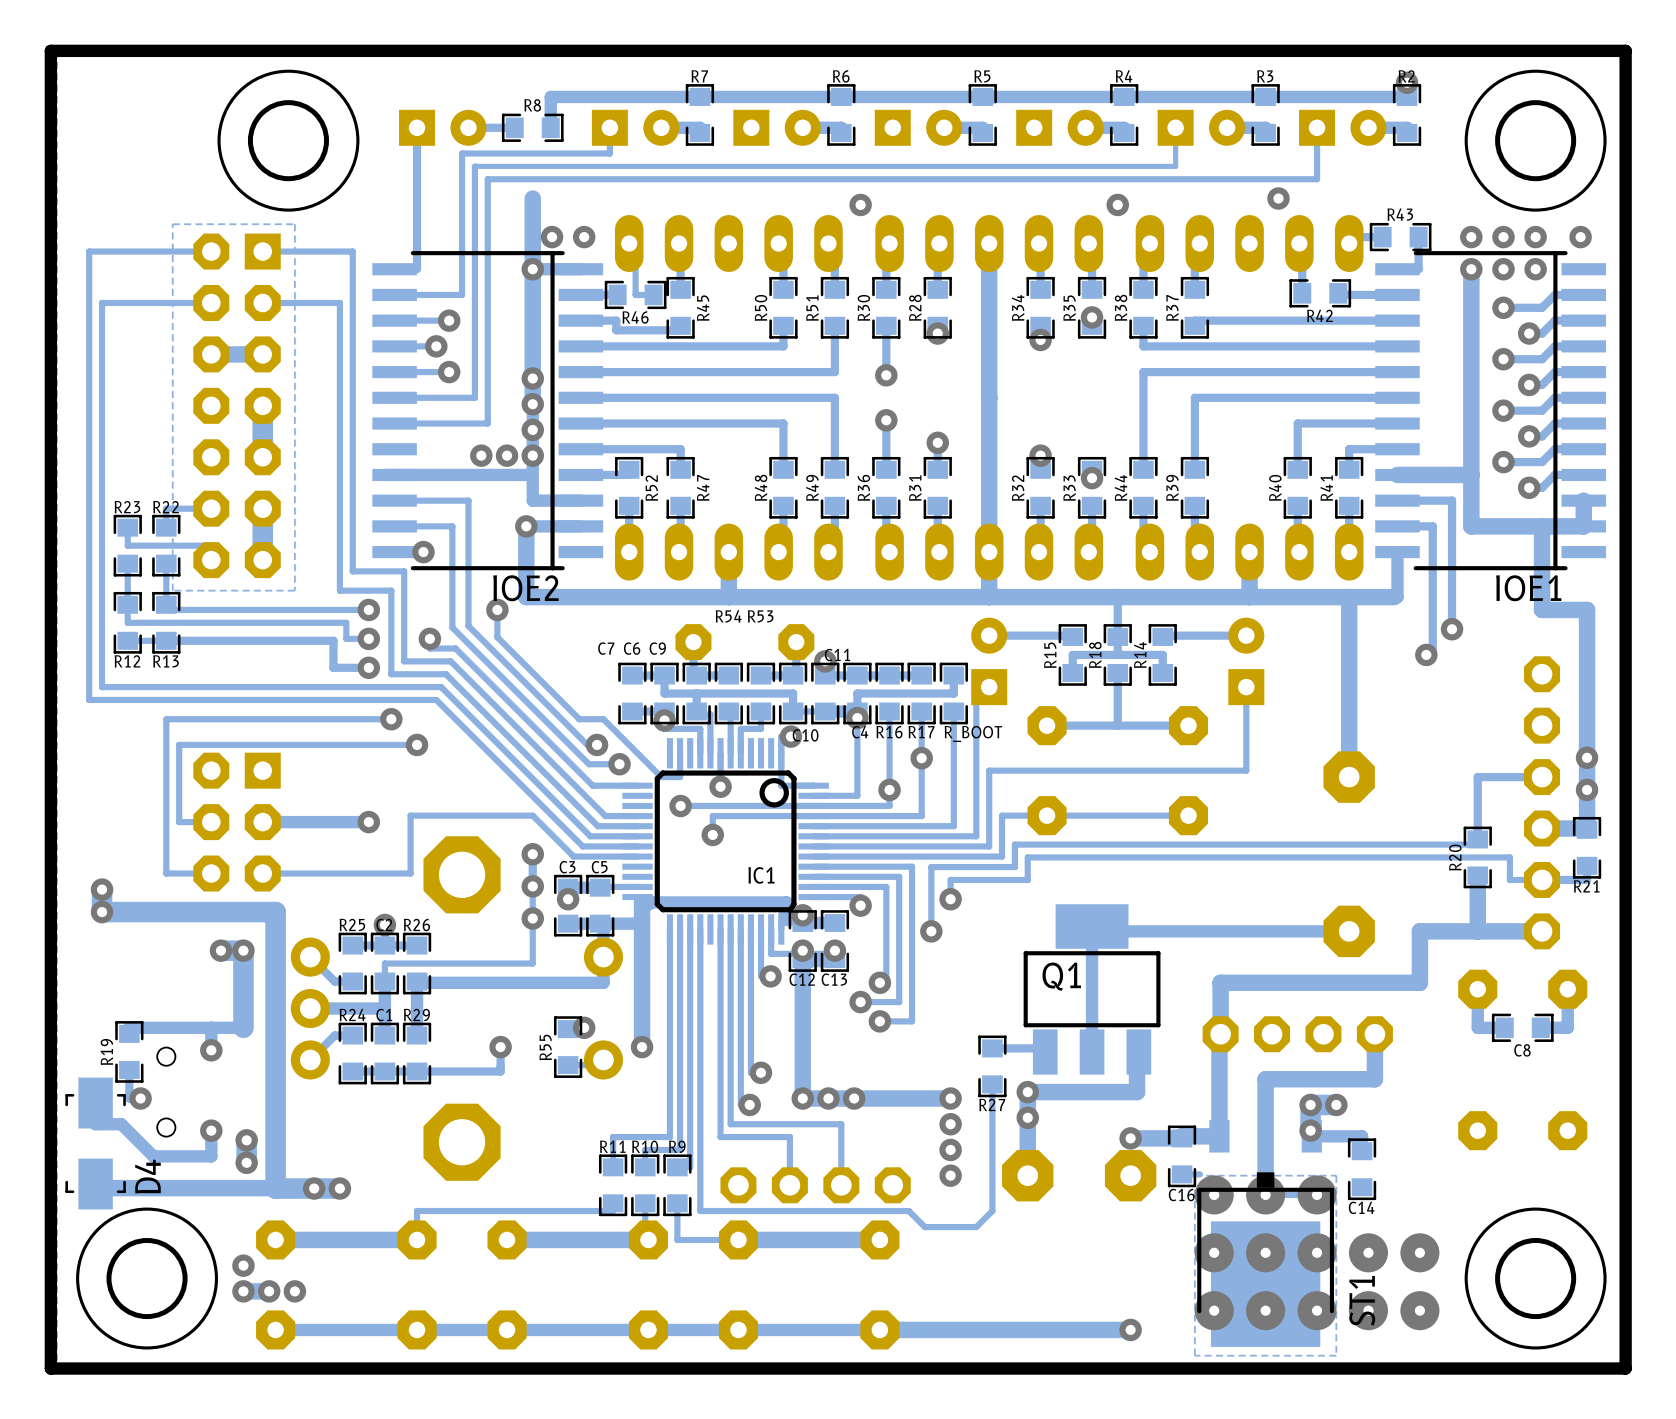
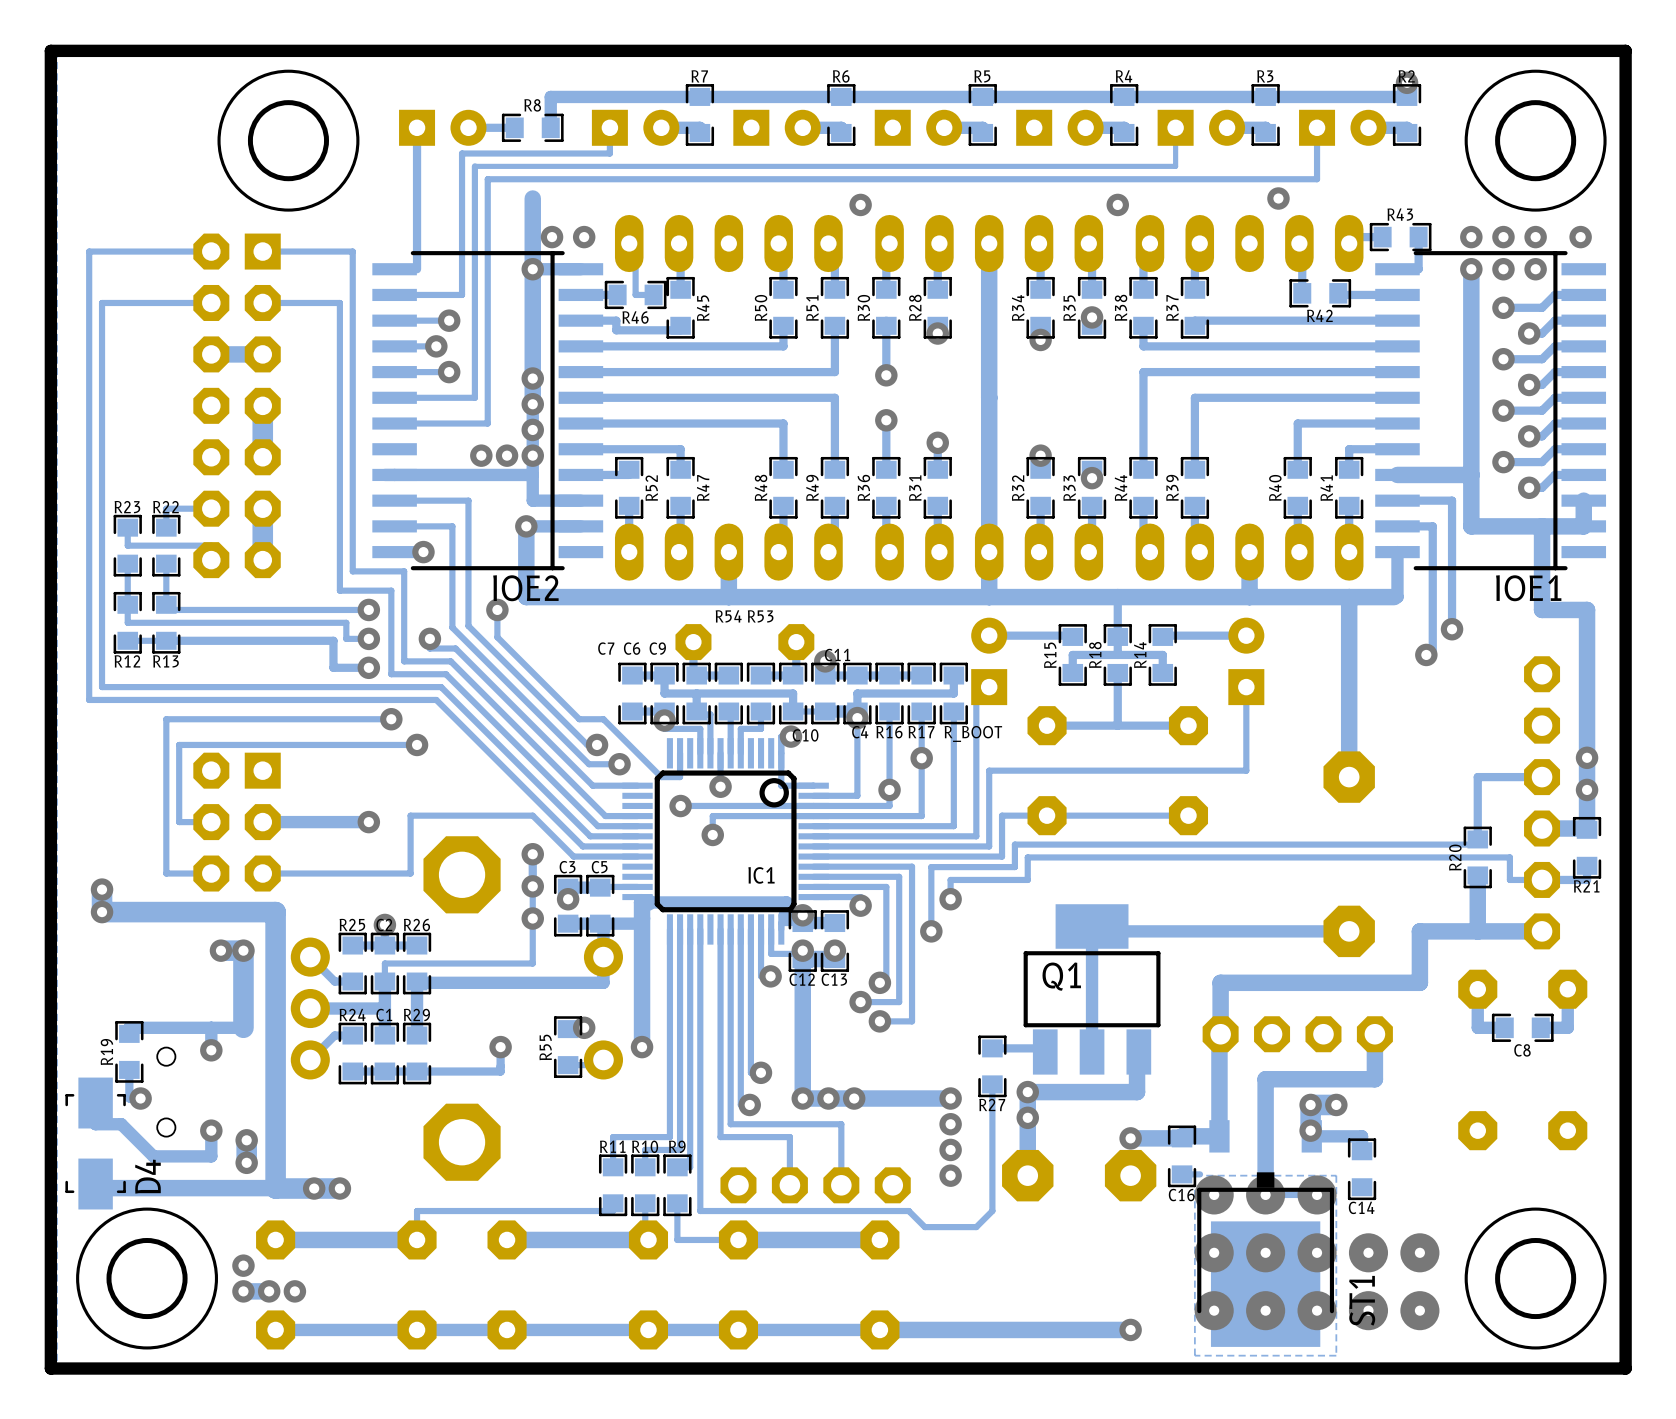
zone outline: (294, 224) (294, 590) (172, 590) (172, 224) (294, 224) -> none

